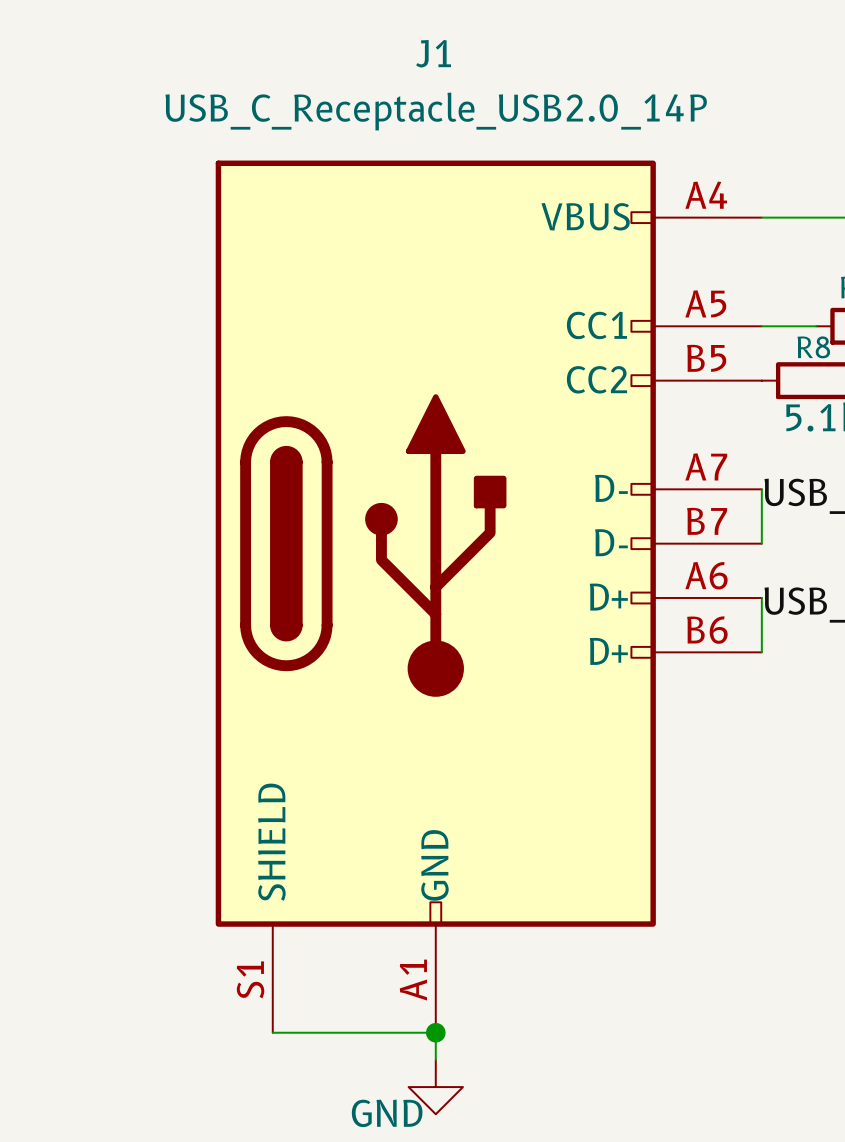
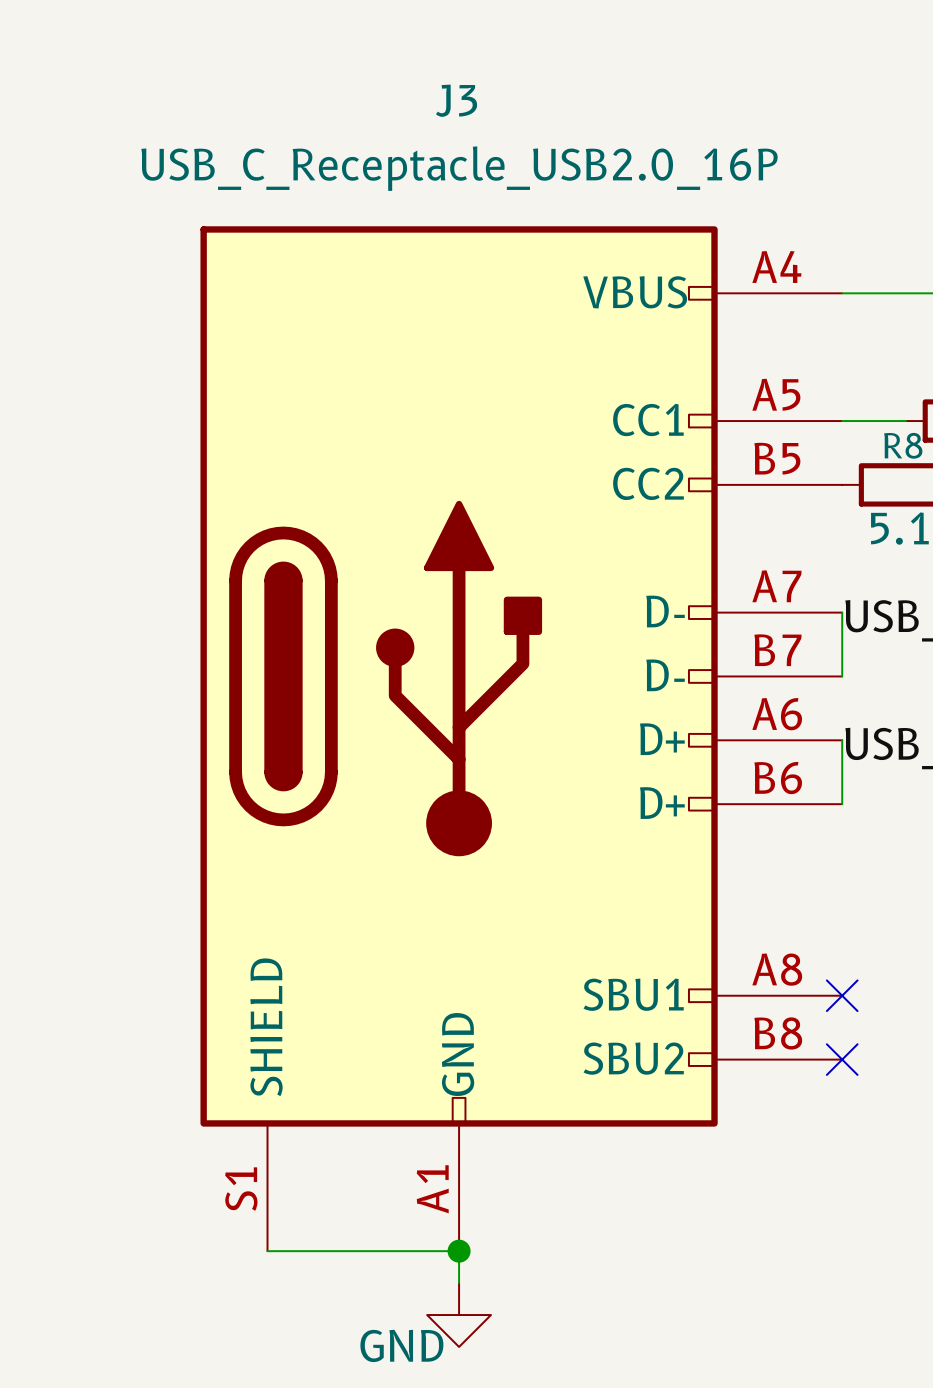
J1: USB_C_Receptacle_USB2.0_14P (488, 596) -> none
J3: none -> USB_C_Receptacle_USB2.0_16P (521, 738)
no-connect mark: none -> (842, 995)
no-connect mark: none -> (842, 1059)

